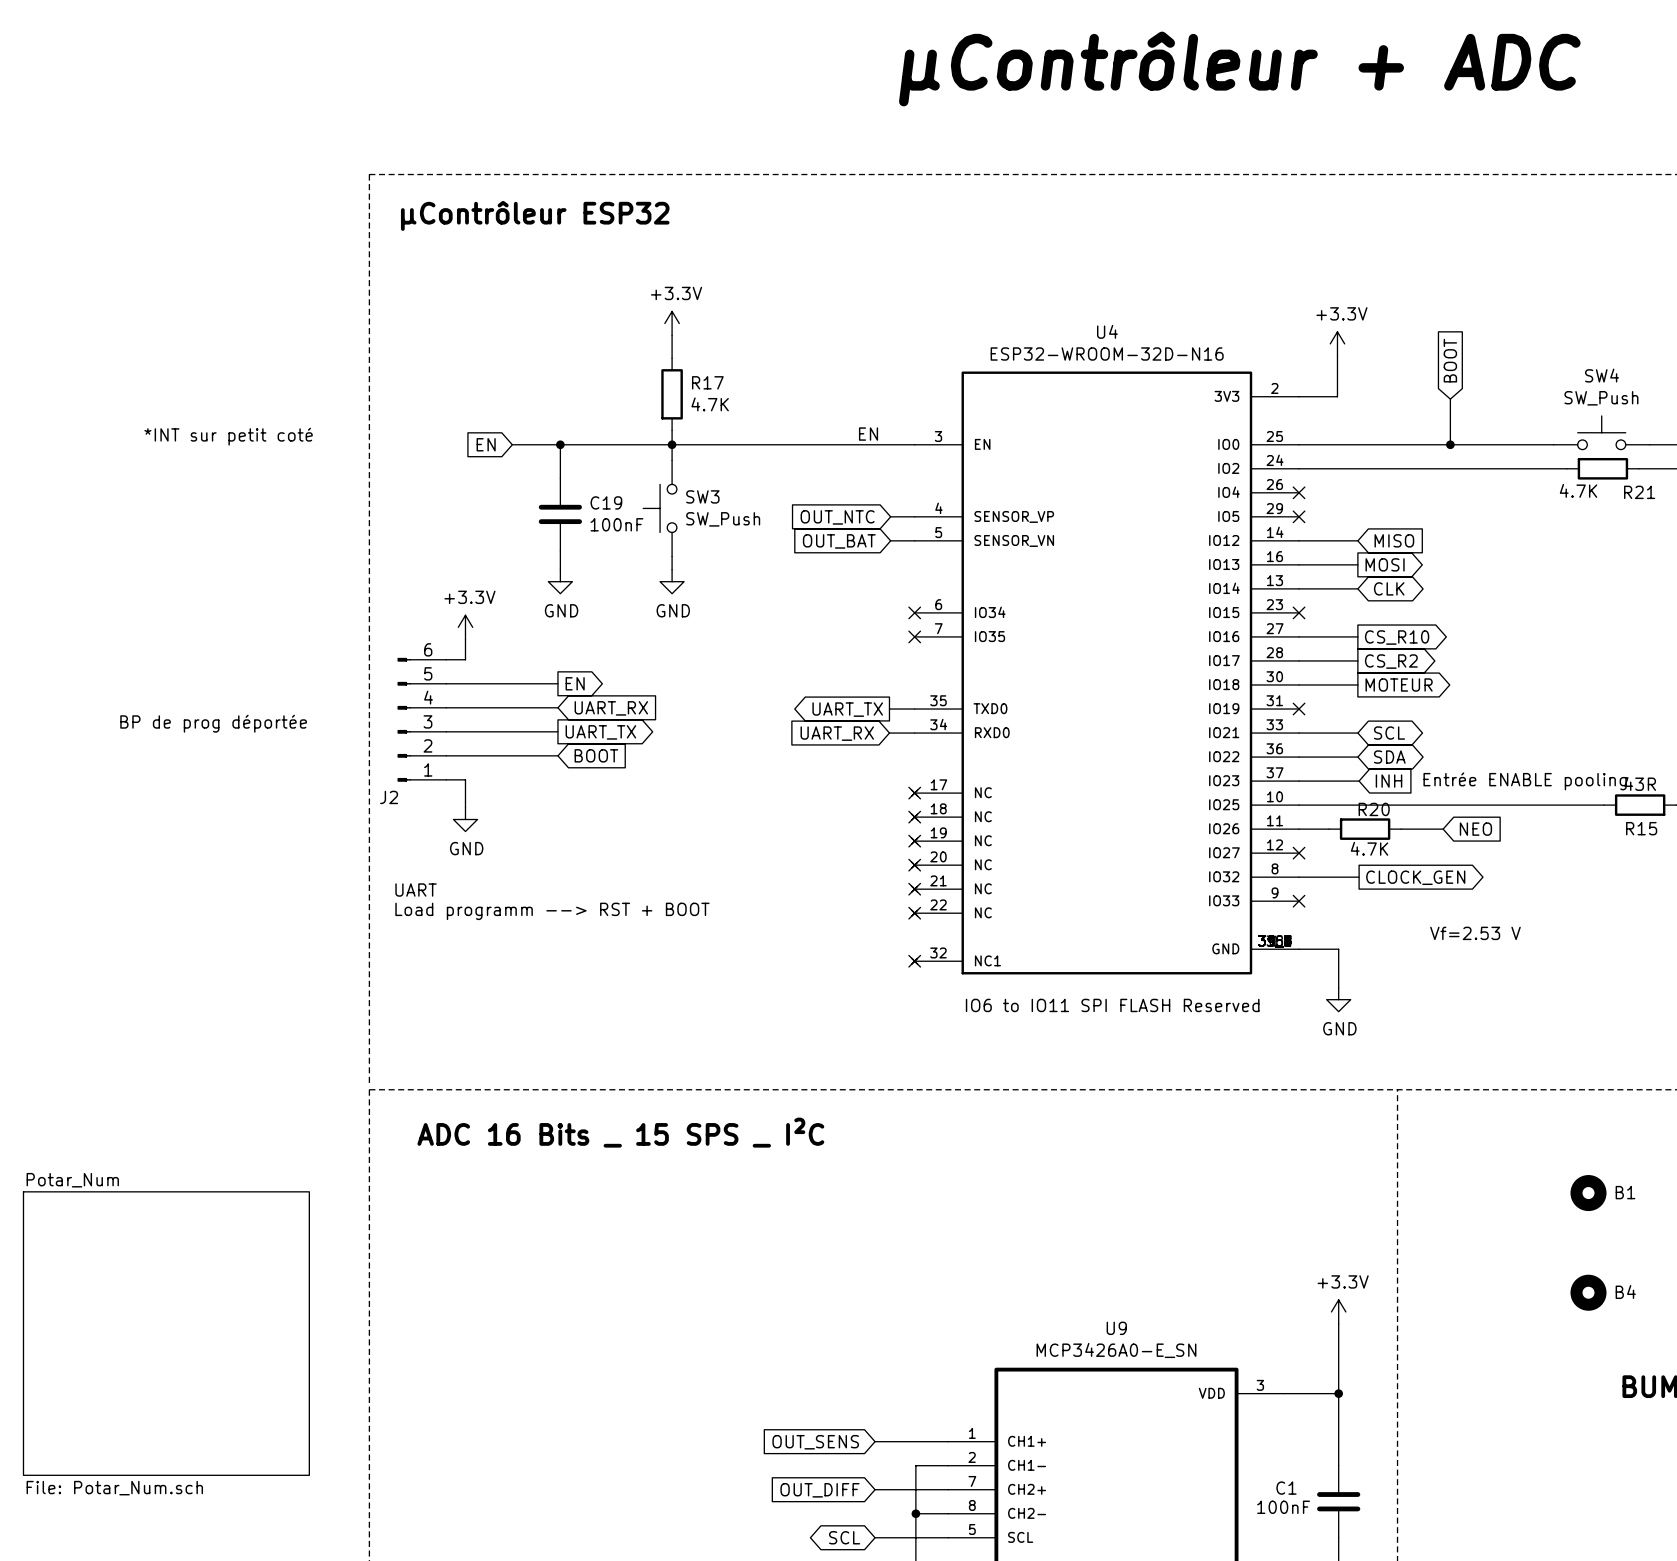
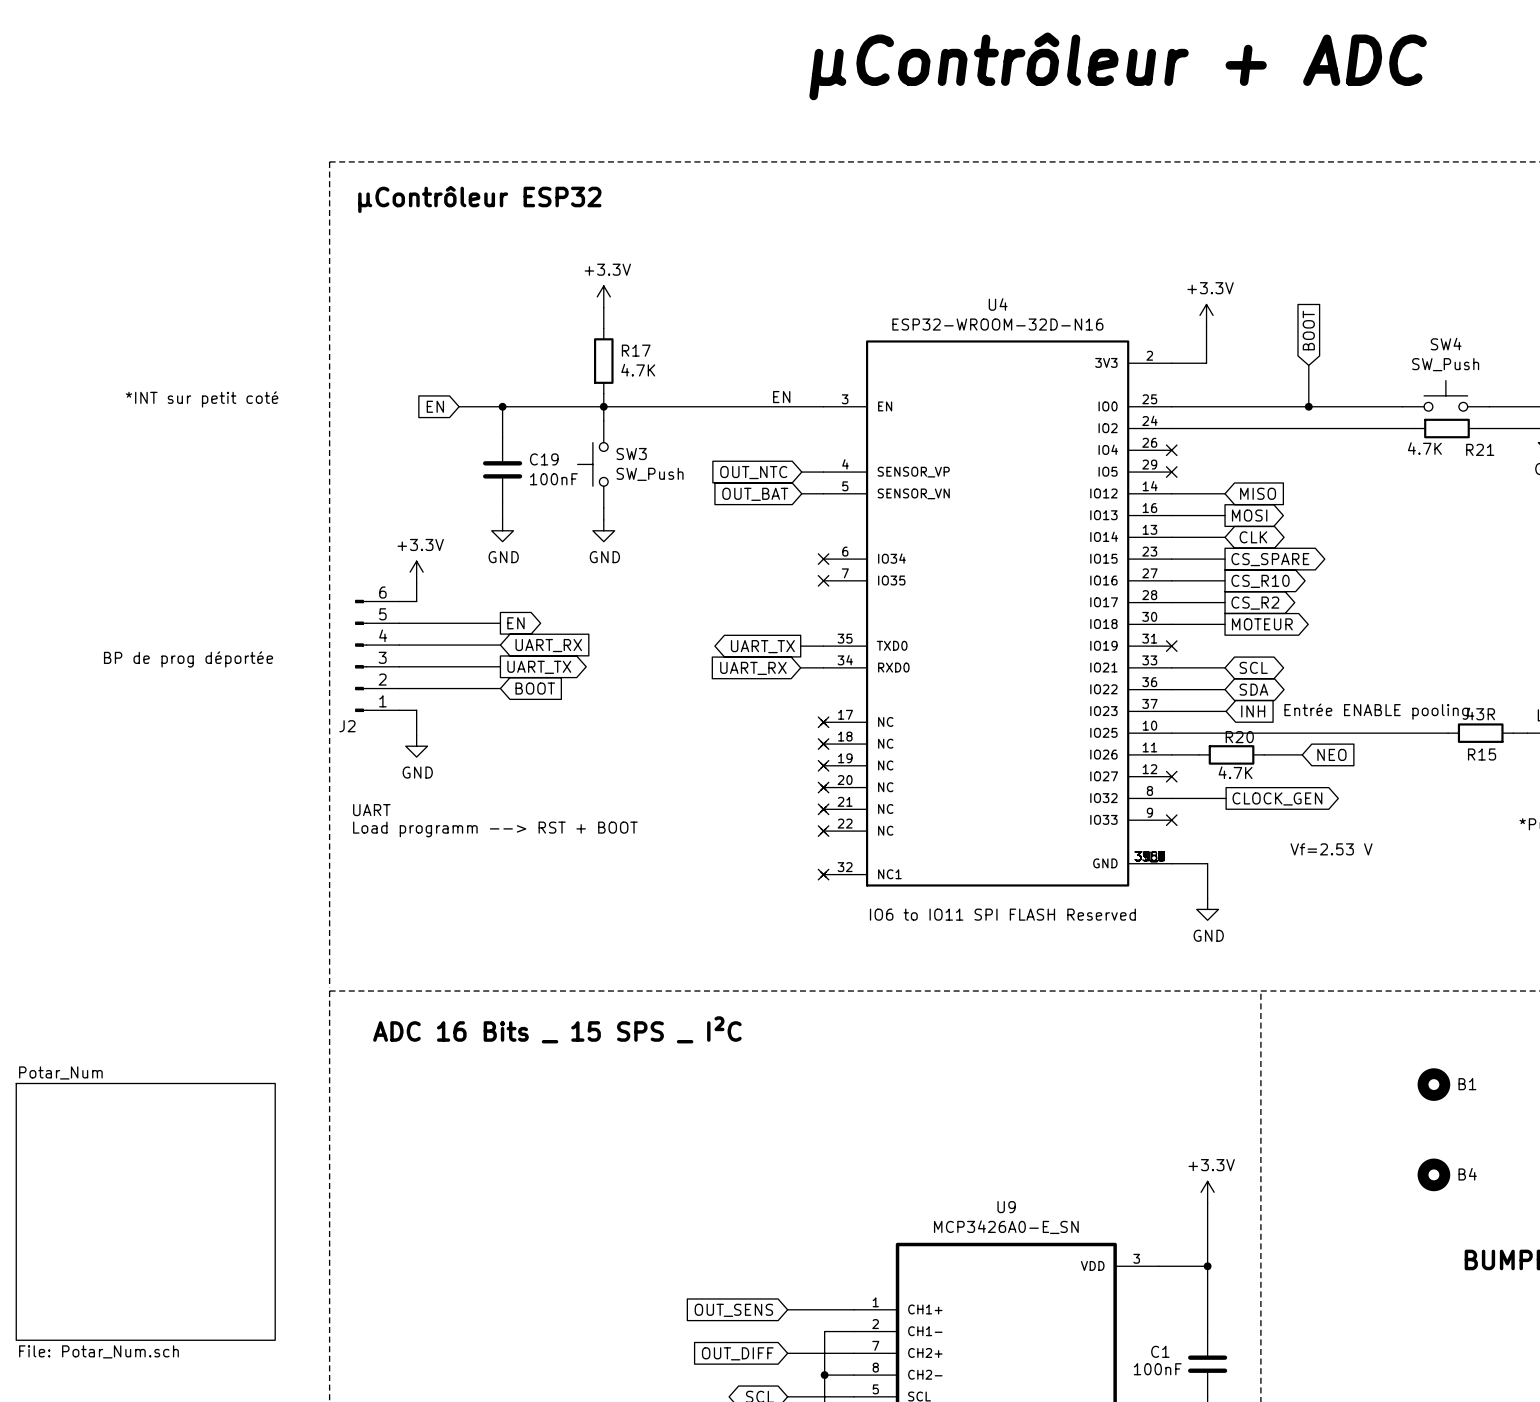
wire: none -> (1171, 559) (1225, 559)
no-connect mark: (1299, 612) -> none
global label: none -> CS_SPARE (1270, 559)

